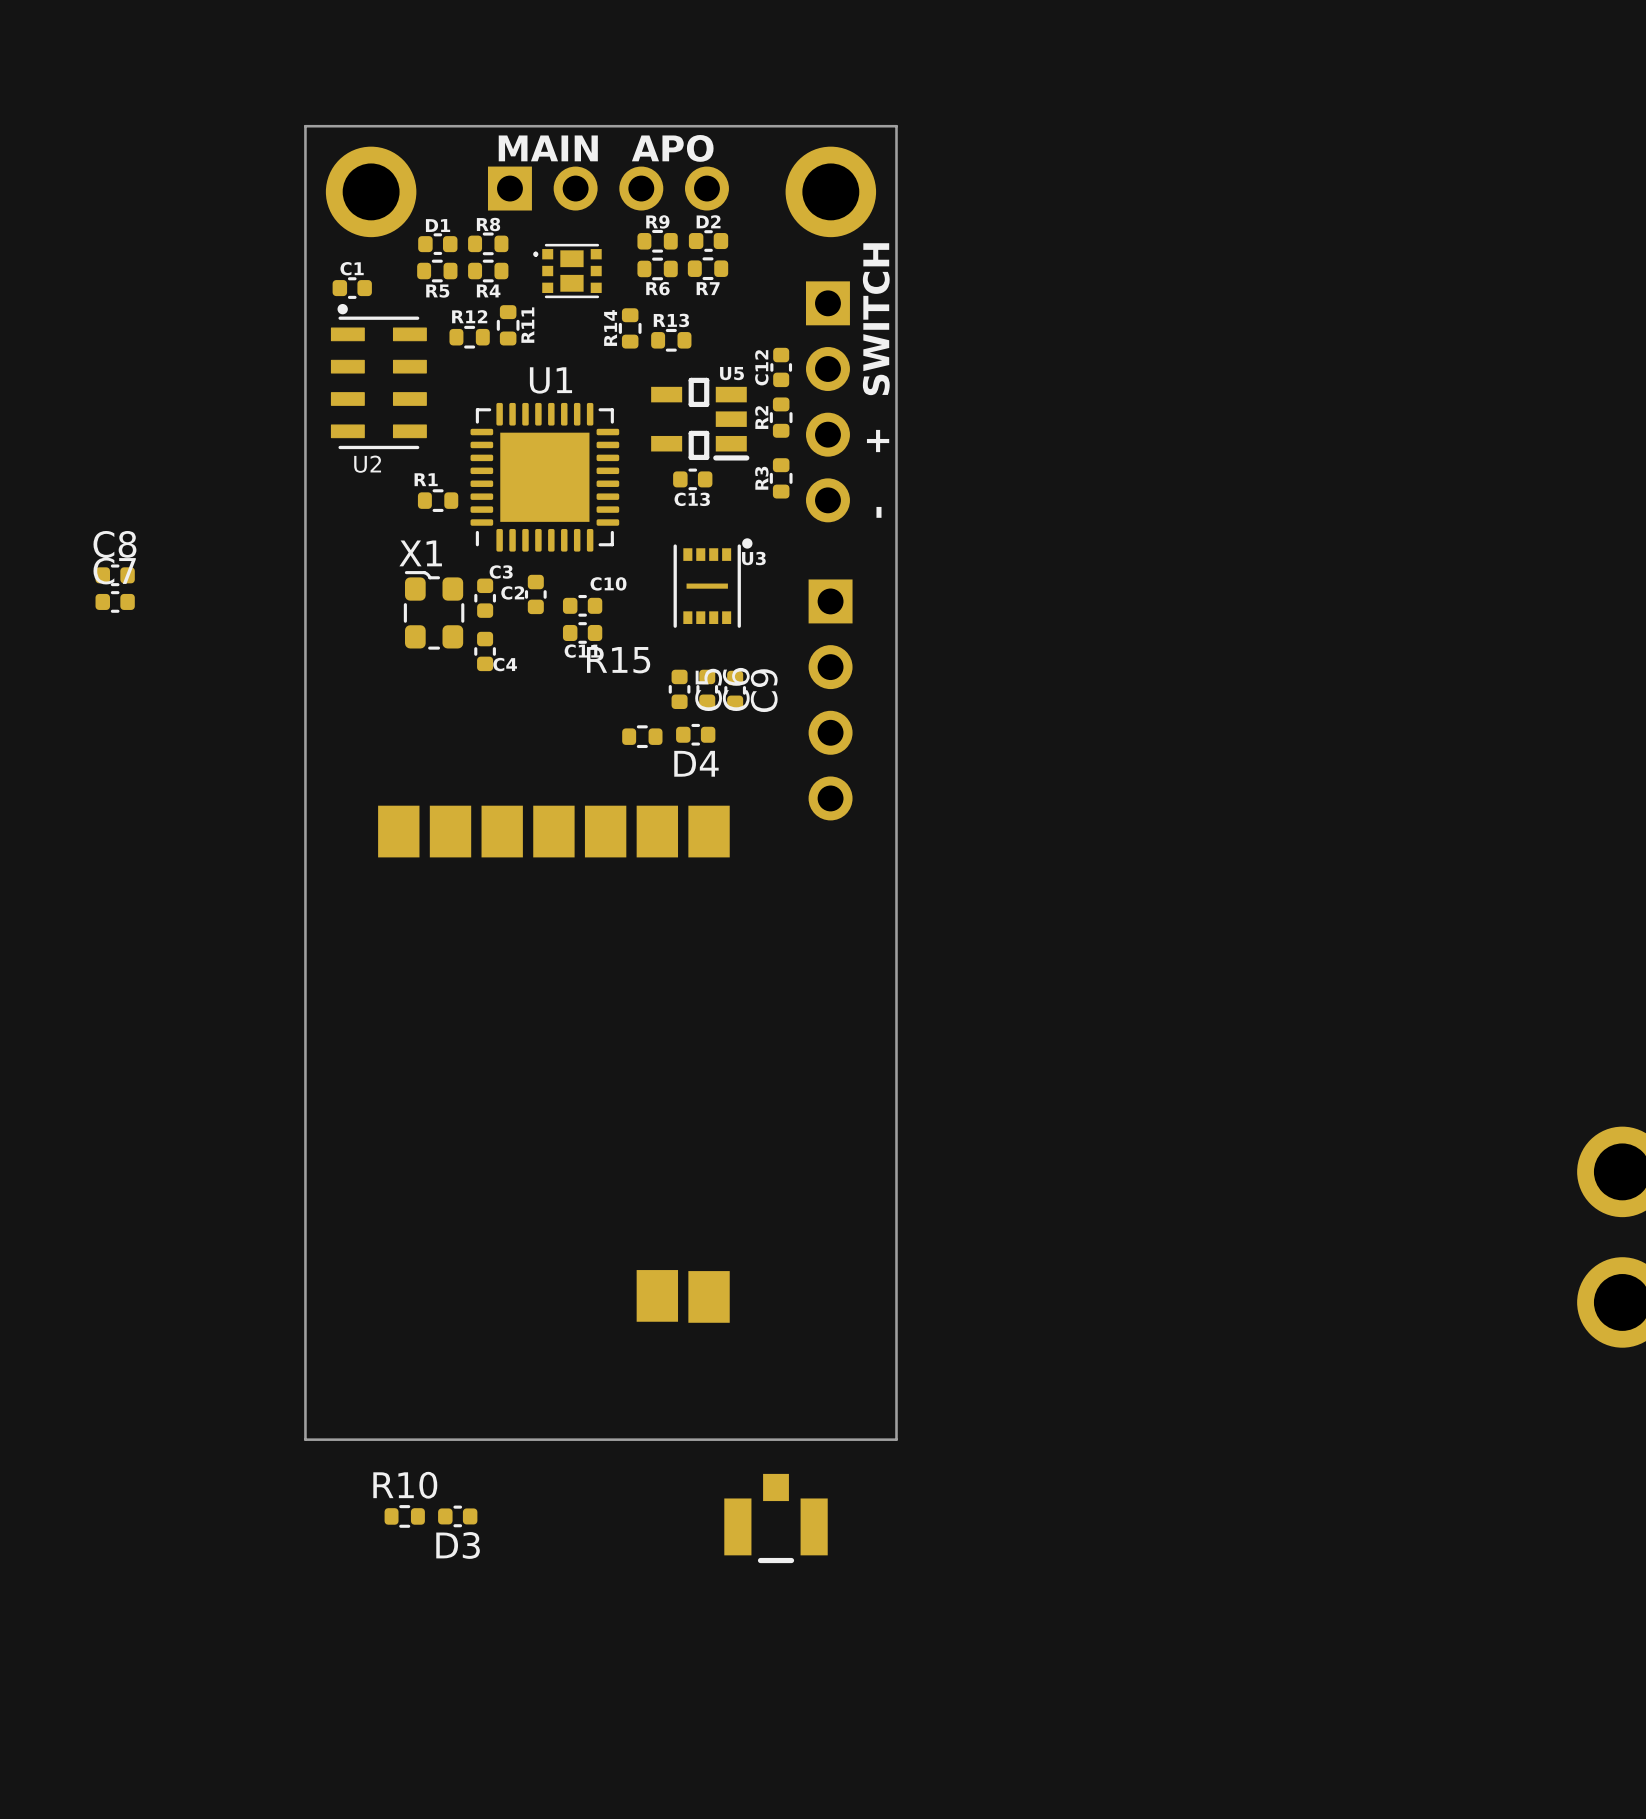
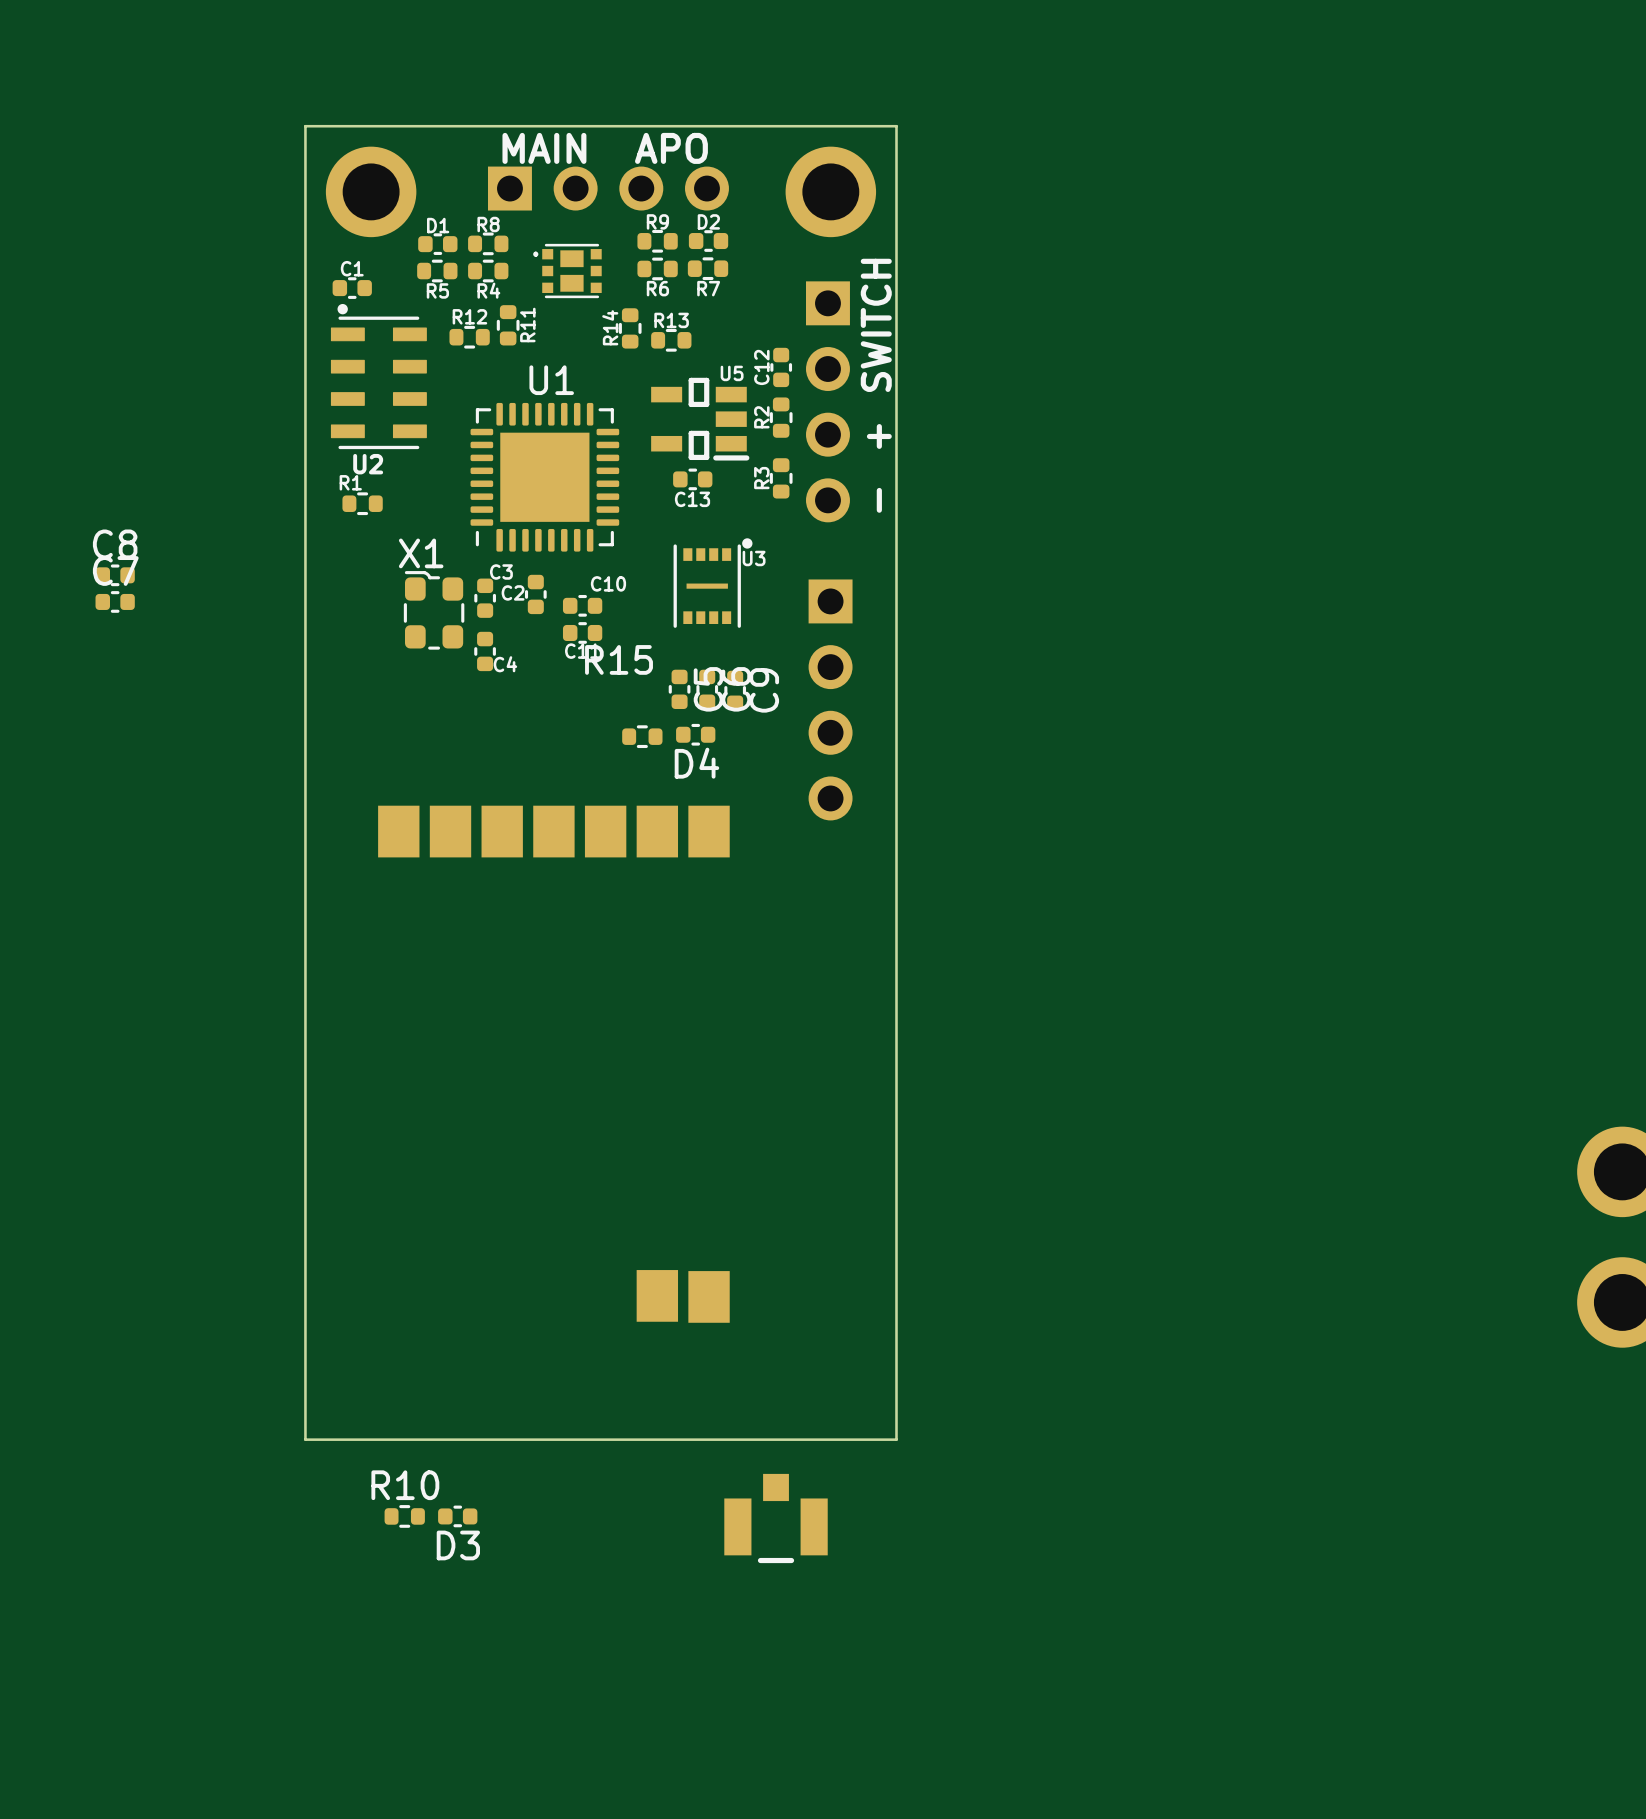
R1 position: (438, 500) -> (362, 503)

